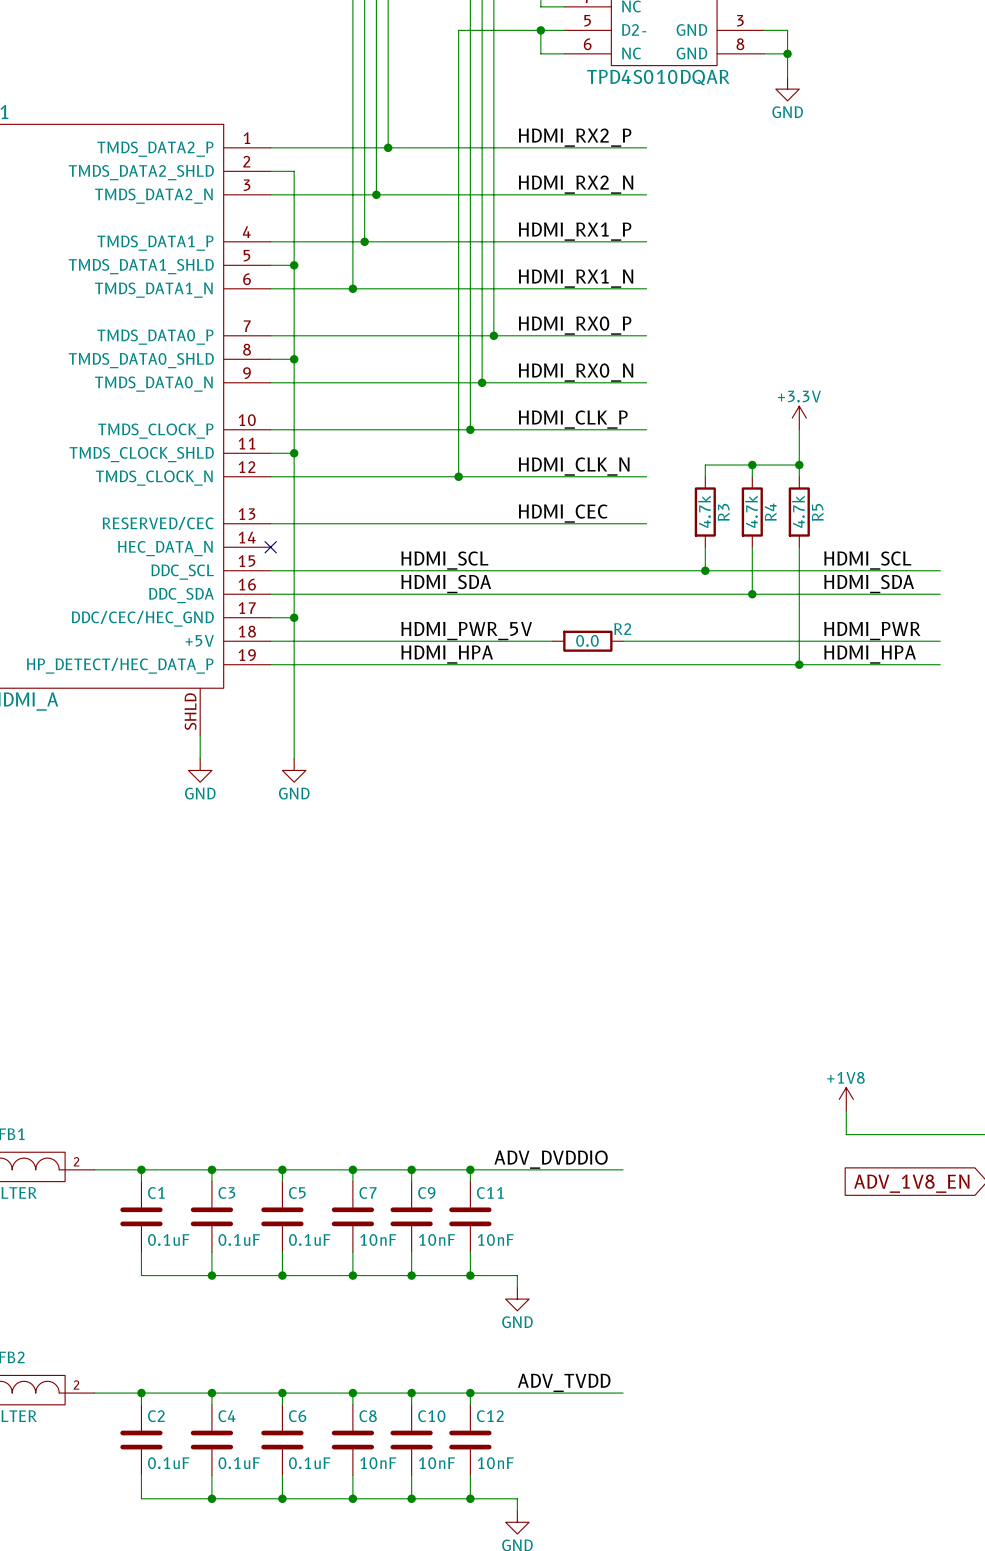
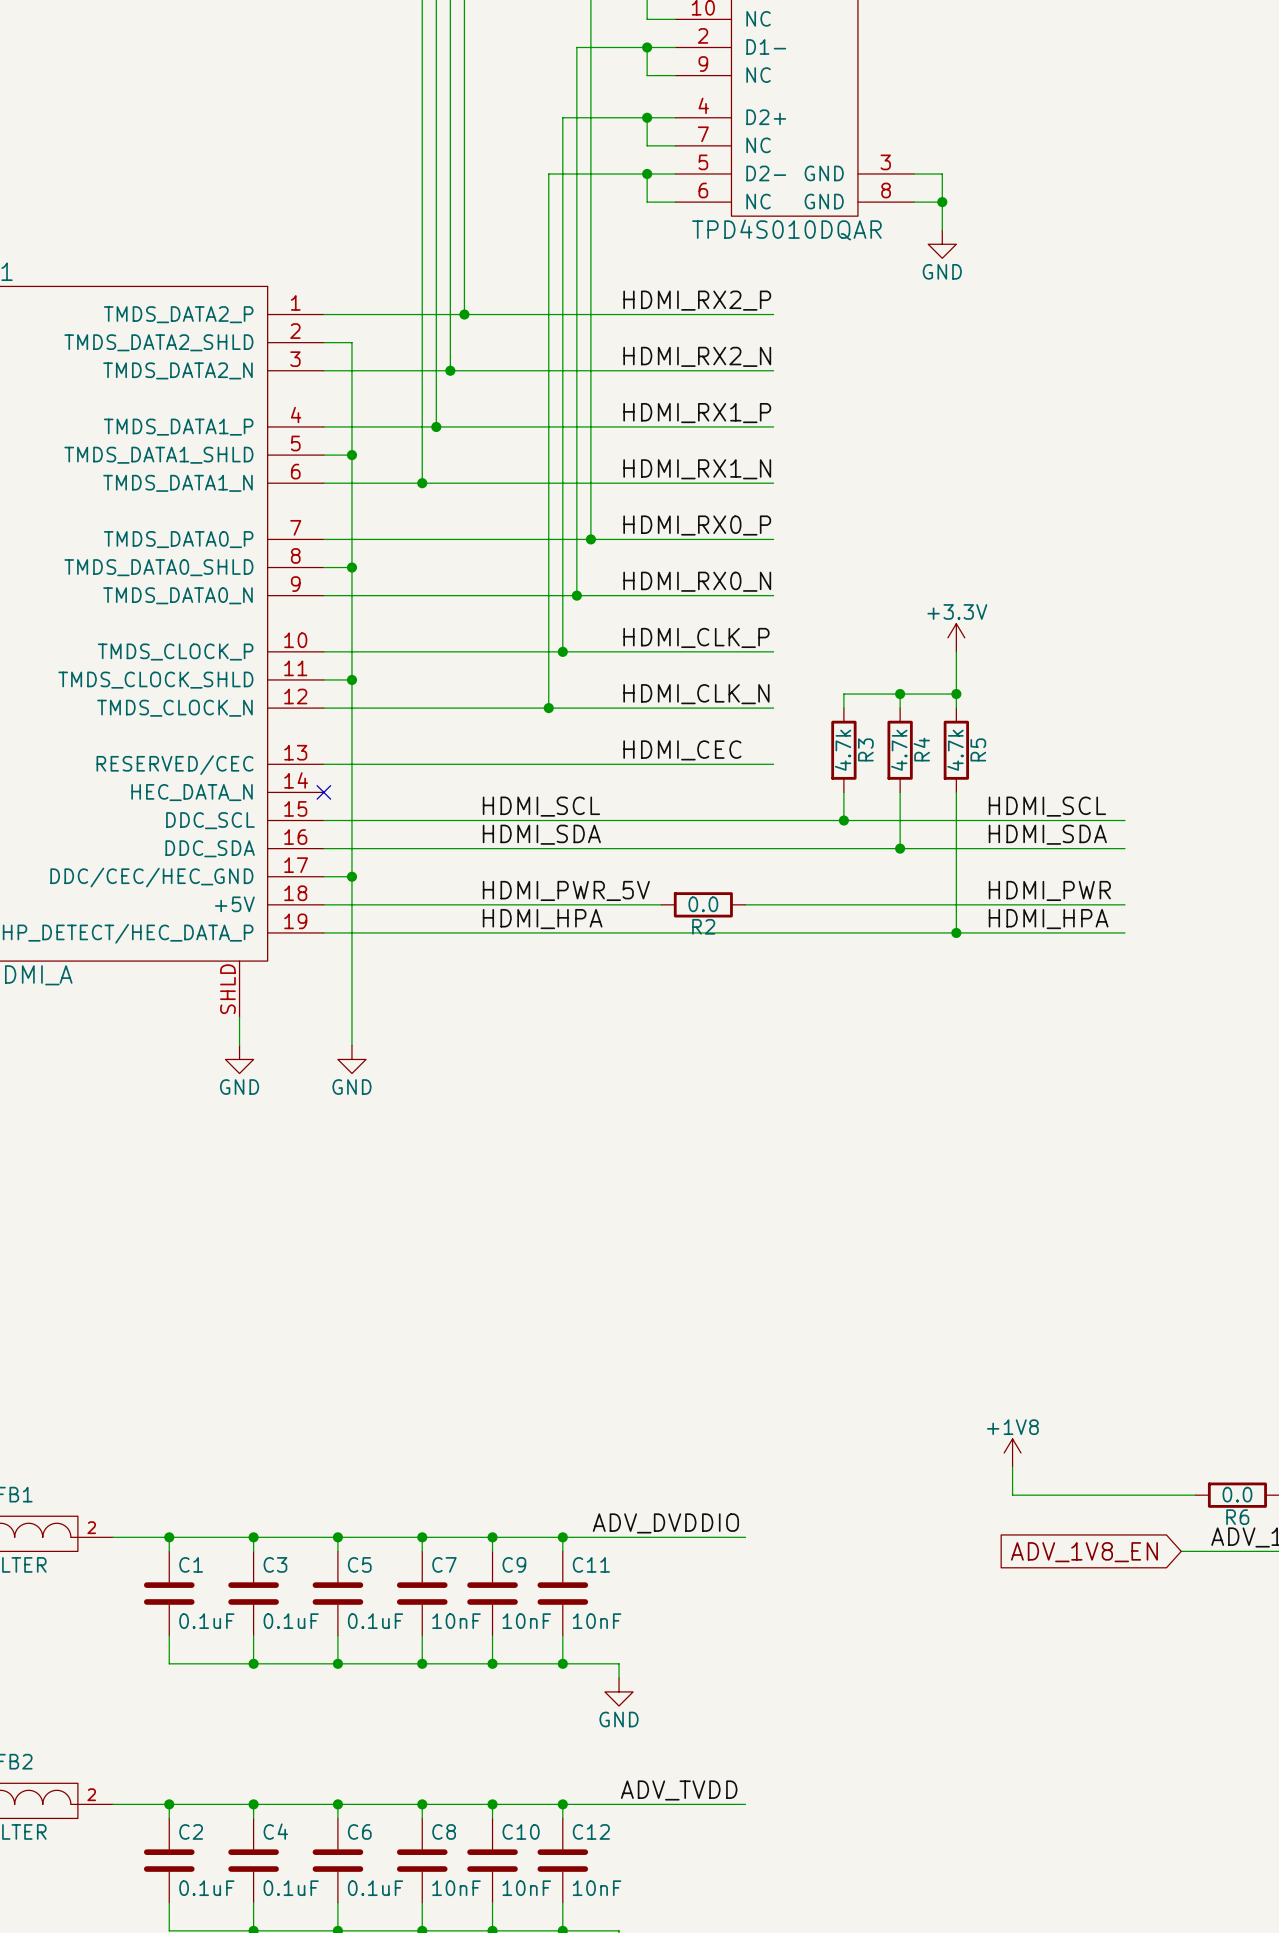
R2 name position: R2 (622, 629) -> R2 (703, 926)

